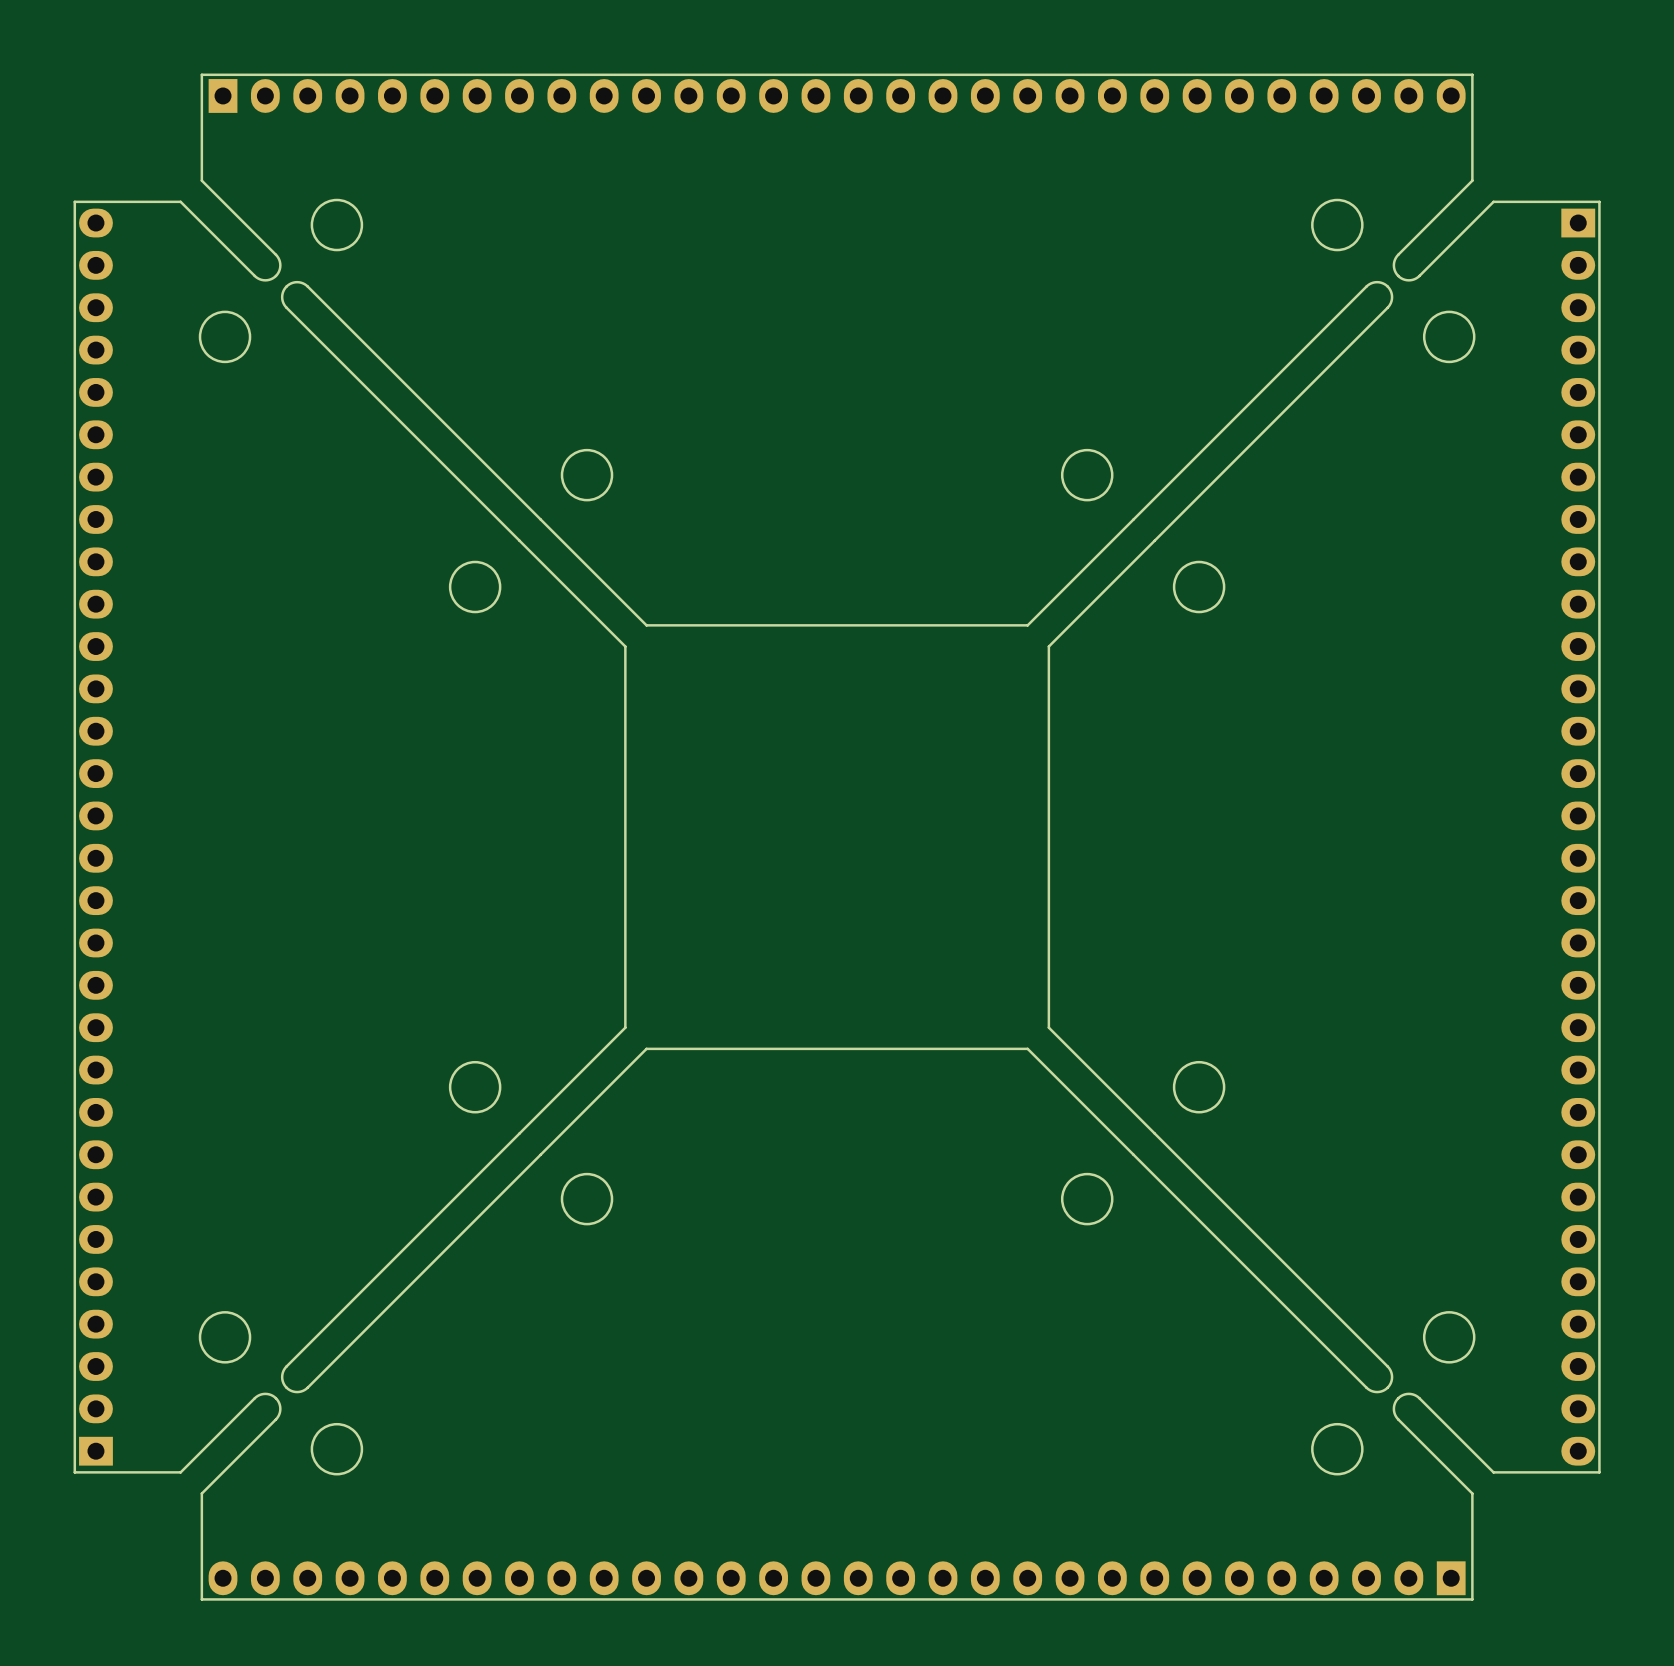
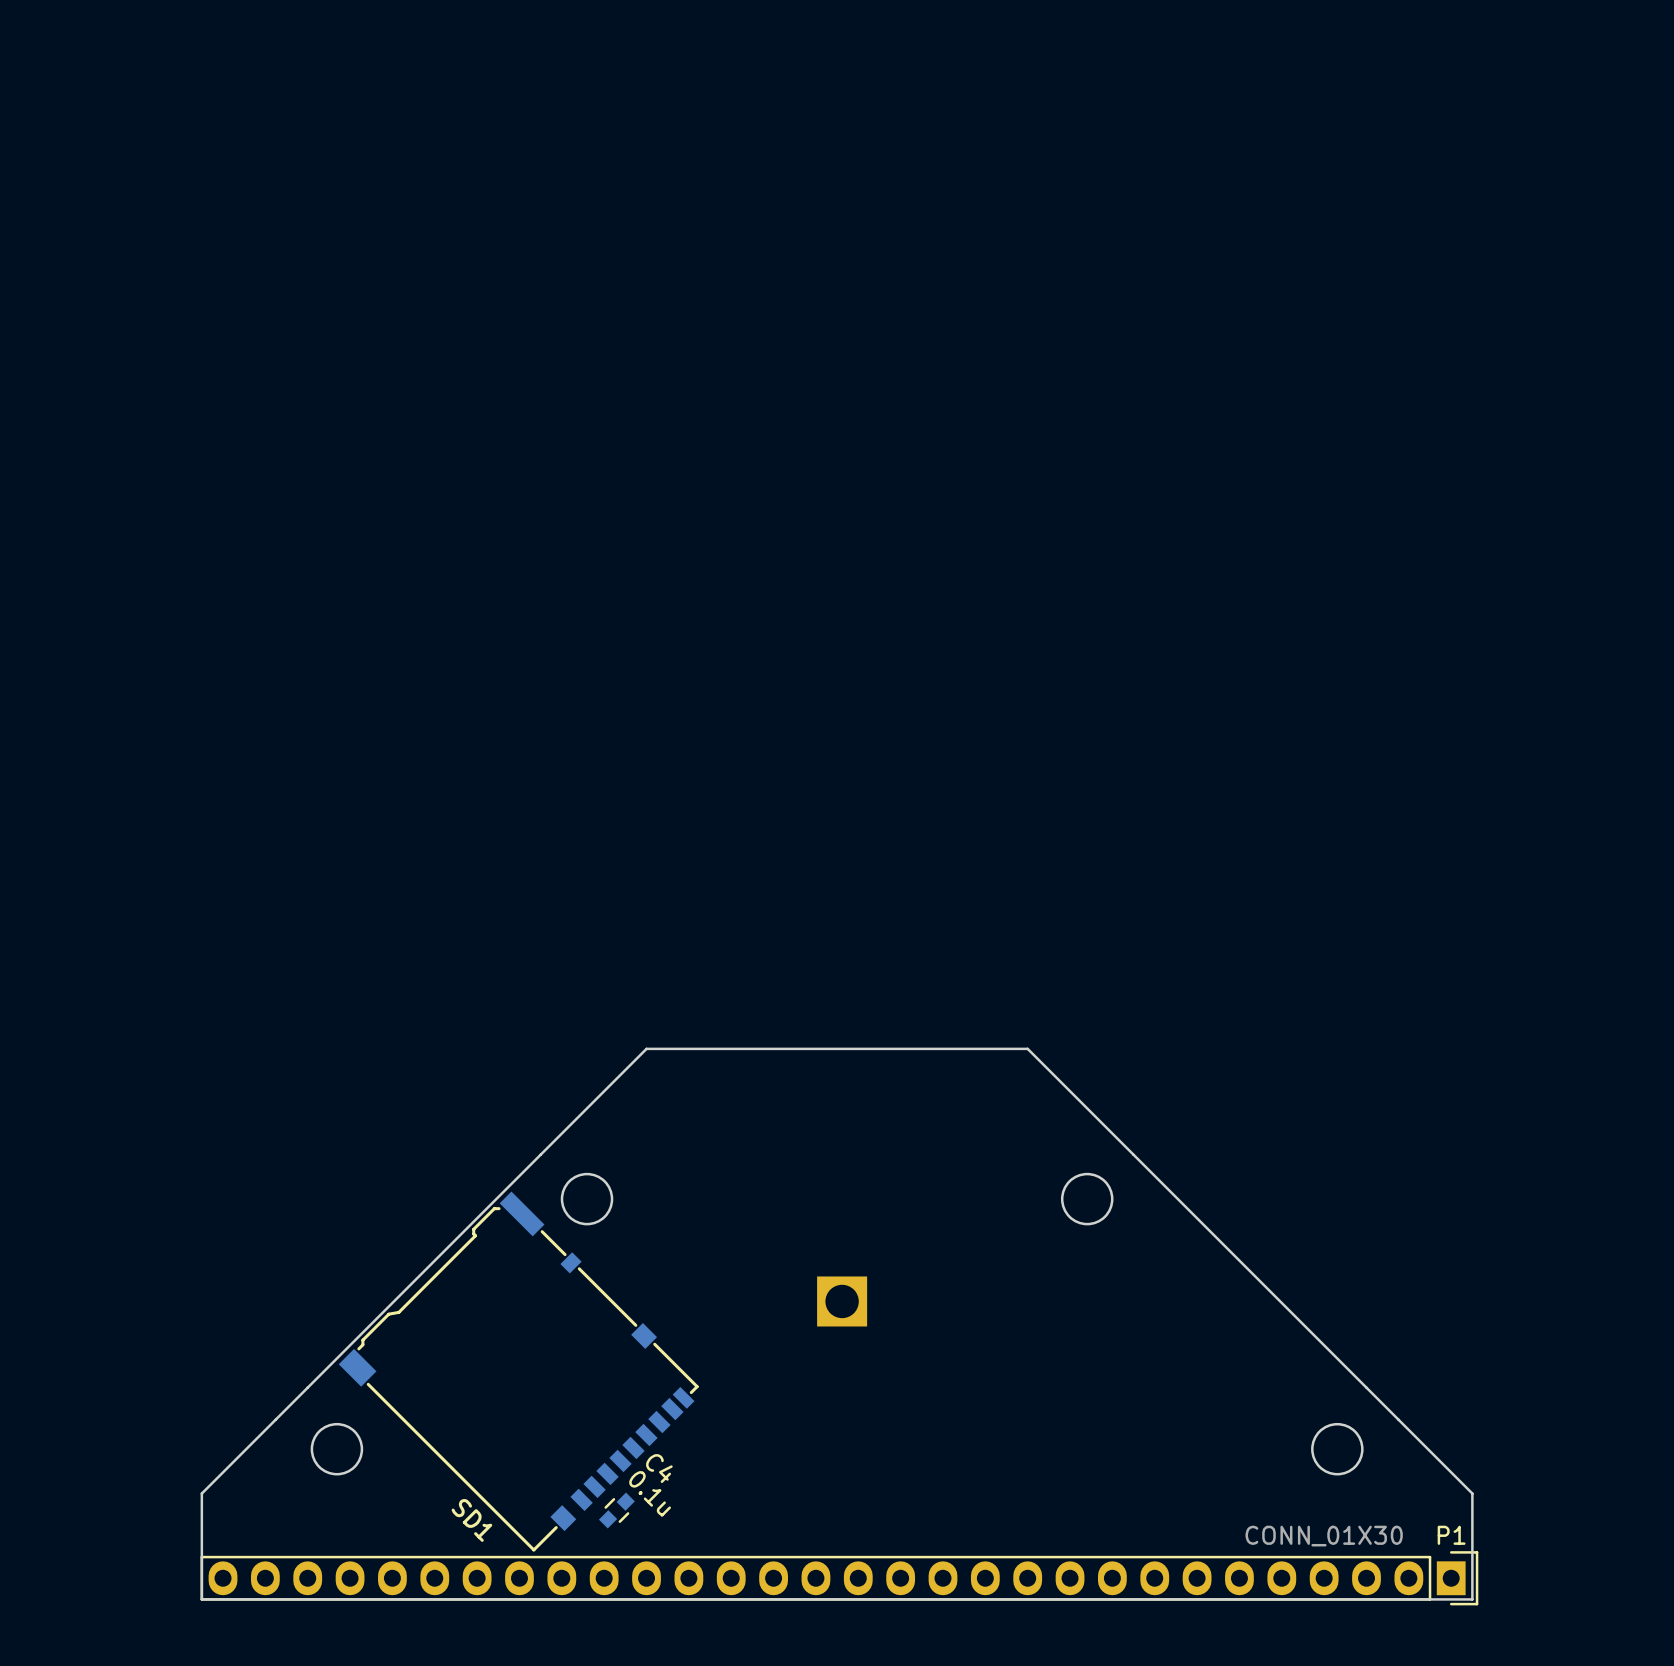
part: (837, 95) -> none
round board edge: [310, 198, 364, 252] -> none
round board edge: [1311, 198, 1364, 252] -> none
board edge: (275, 254) (280, 265) (275, 275) -> none
board edge: (275, 254) (201, 180) (201, 74) (1472, 74) (1472, 180) (1396, 256) (1394, 267) (1398, 275) -> none
board edge: (275, 275) (267, 280) (256, 277) (180, 201) (74, 201) (74, 1472) (180, 1472) (254, 1398) (261, 1394) (271, 1395) (278, 1401) (280, 1410) (275, 1419) -> none
board edge: (1398, 275) (1408, 280) (1419, 275) -> none
board edge: (1419, 275) (1493, 201) (1599, 201) (1599, 1472) (1493, 1472) (1417, 1396) (1406, 1394) (1398, 1398) -> none
round board edge: [198, 310, 252, 364] -> none
round board edge: [1422, 310, 1476, 364] -> none
round board edge: [560, 448, 614, 502] -> none
round board edge: [1060, 448, 1114, 502] -> none
round board edge: [448, 560, 502, 614] -> none
round board edge: [1172, 560, 1226, 614] -> none
part: (95, 837) -> none
part: (1578, 837) -> none
round board edge: [448, 1060, 502, 1114] -> none
round board edge: [1172, 1060, 1226, 1114] -> none
part: none -> (842, 1301)
round board edge: [198, 1311, 252, 1364] -> none
round board edge: [1422, 1311, 1476, 1364] -> none
SD1: none -> (518, 1371)
board edge: (1366, 1387) (1377, 1392) (1387, 1387) (1392, 1377) (1387, 1366) (1048, 1027) (1048, 646) (1387, 307) (1391, 299) (1390, 291) (1386, 285) (1377, 282) (1366, 286) (1027, 625) (646, 625) (307, 286) (297, 282) (286, 286) (282, 297) (286, 307) (625, 646) (625, 1027) (286, 1366) (282, 1377) (286, 1387) (297, 1392) (307, 1387) -> (275, 1419) (307, 1387)
board edge: (1398, 1398) (1393, 1408) (1398, 1419) -> (1366, 1387) (1398, 1419)
C4: none -> 0.1u (616, 1510)
P1 side: top (837, 1578) -> bottom (839, 1578)

